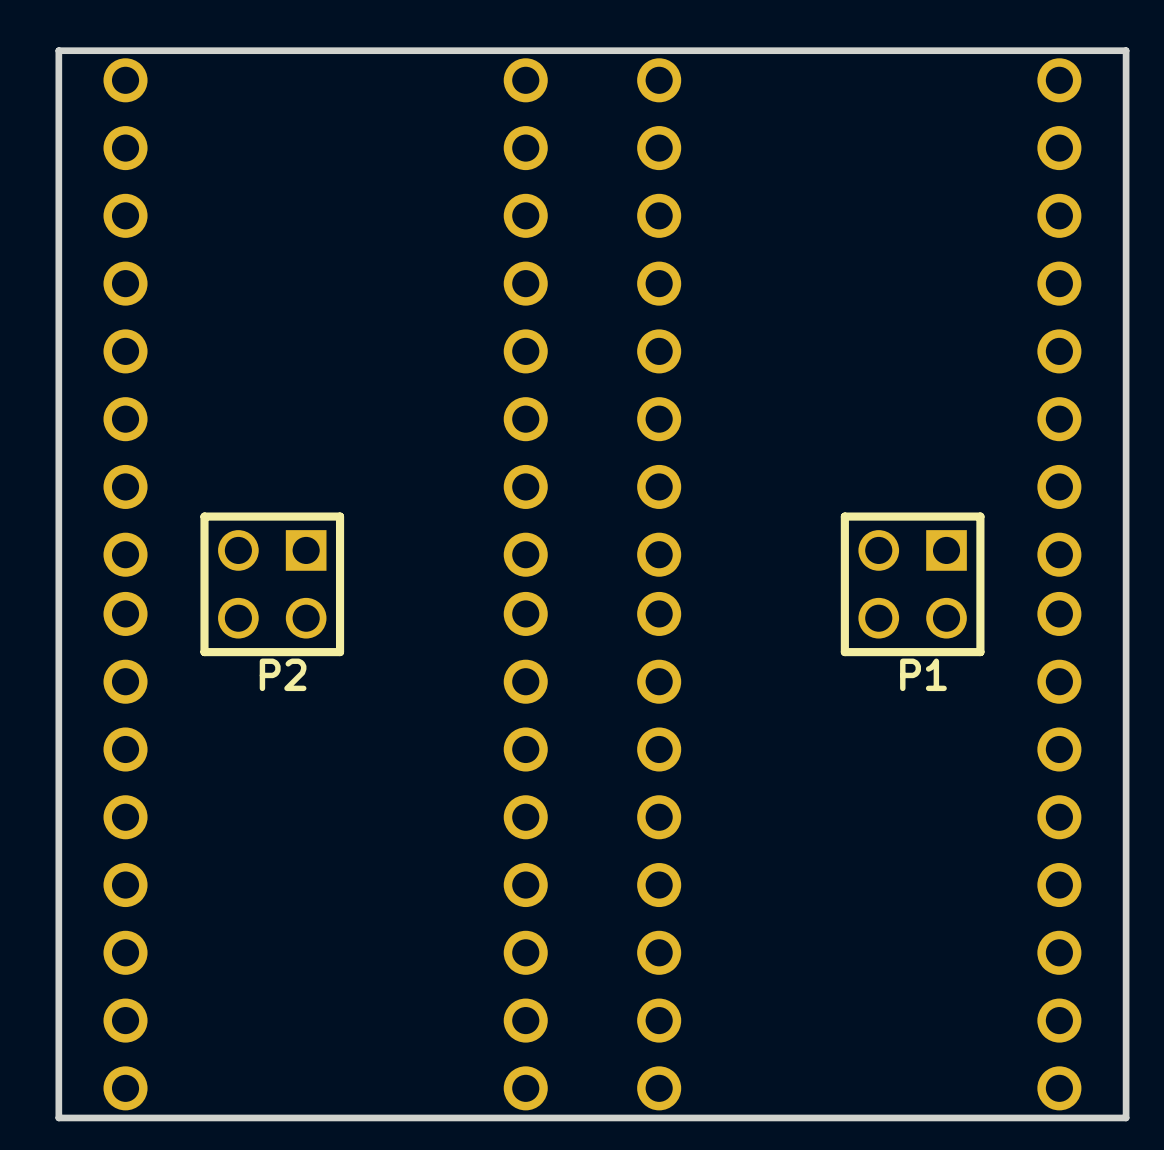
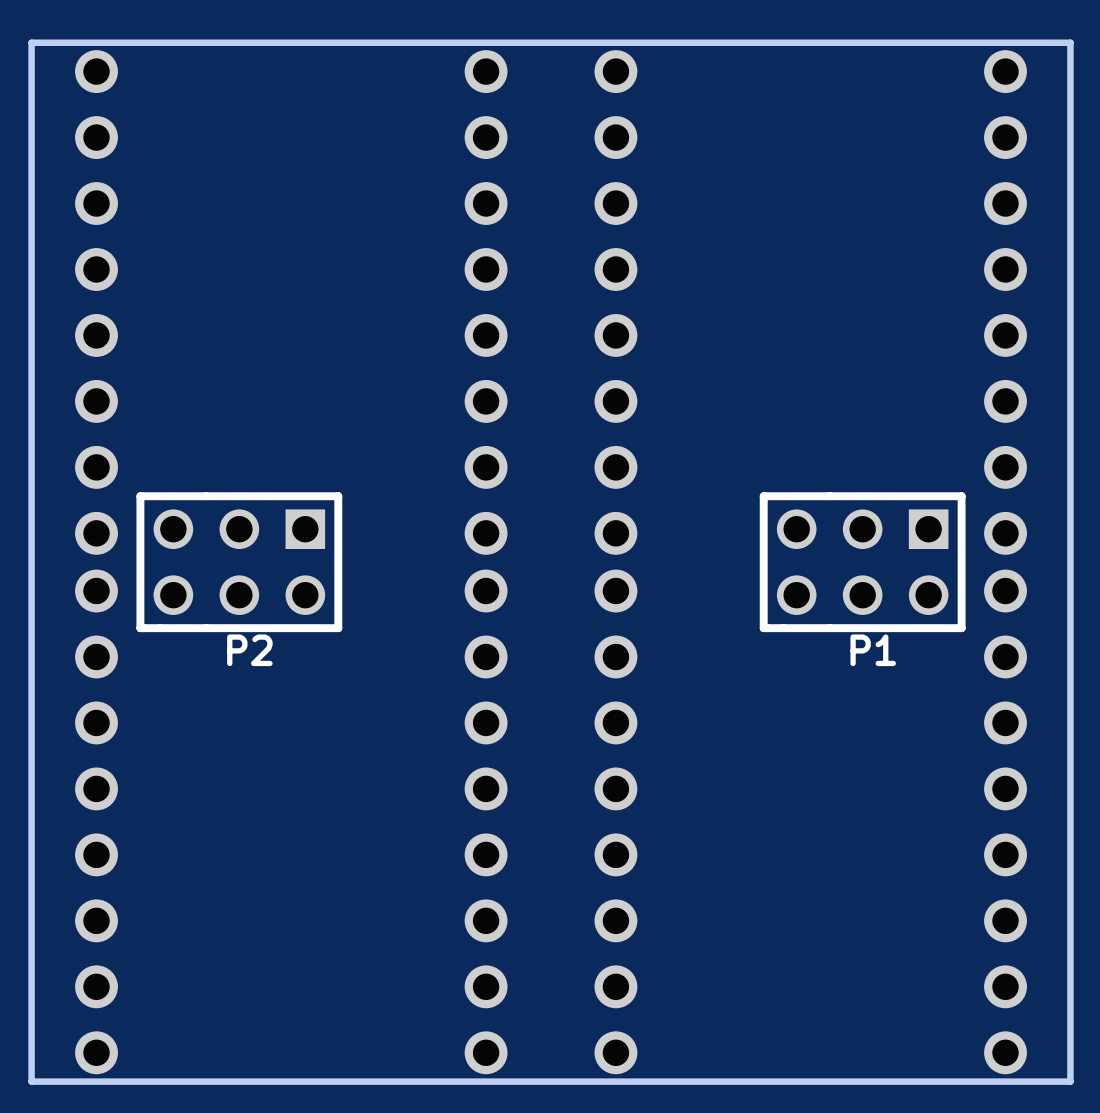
P2 footprint: [200, 512, 345, 657] -> [136, 492, 343, 633]
P1 footprint: [840, 512, 985, 657] -> [759, 492, 966, 633]

